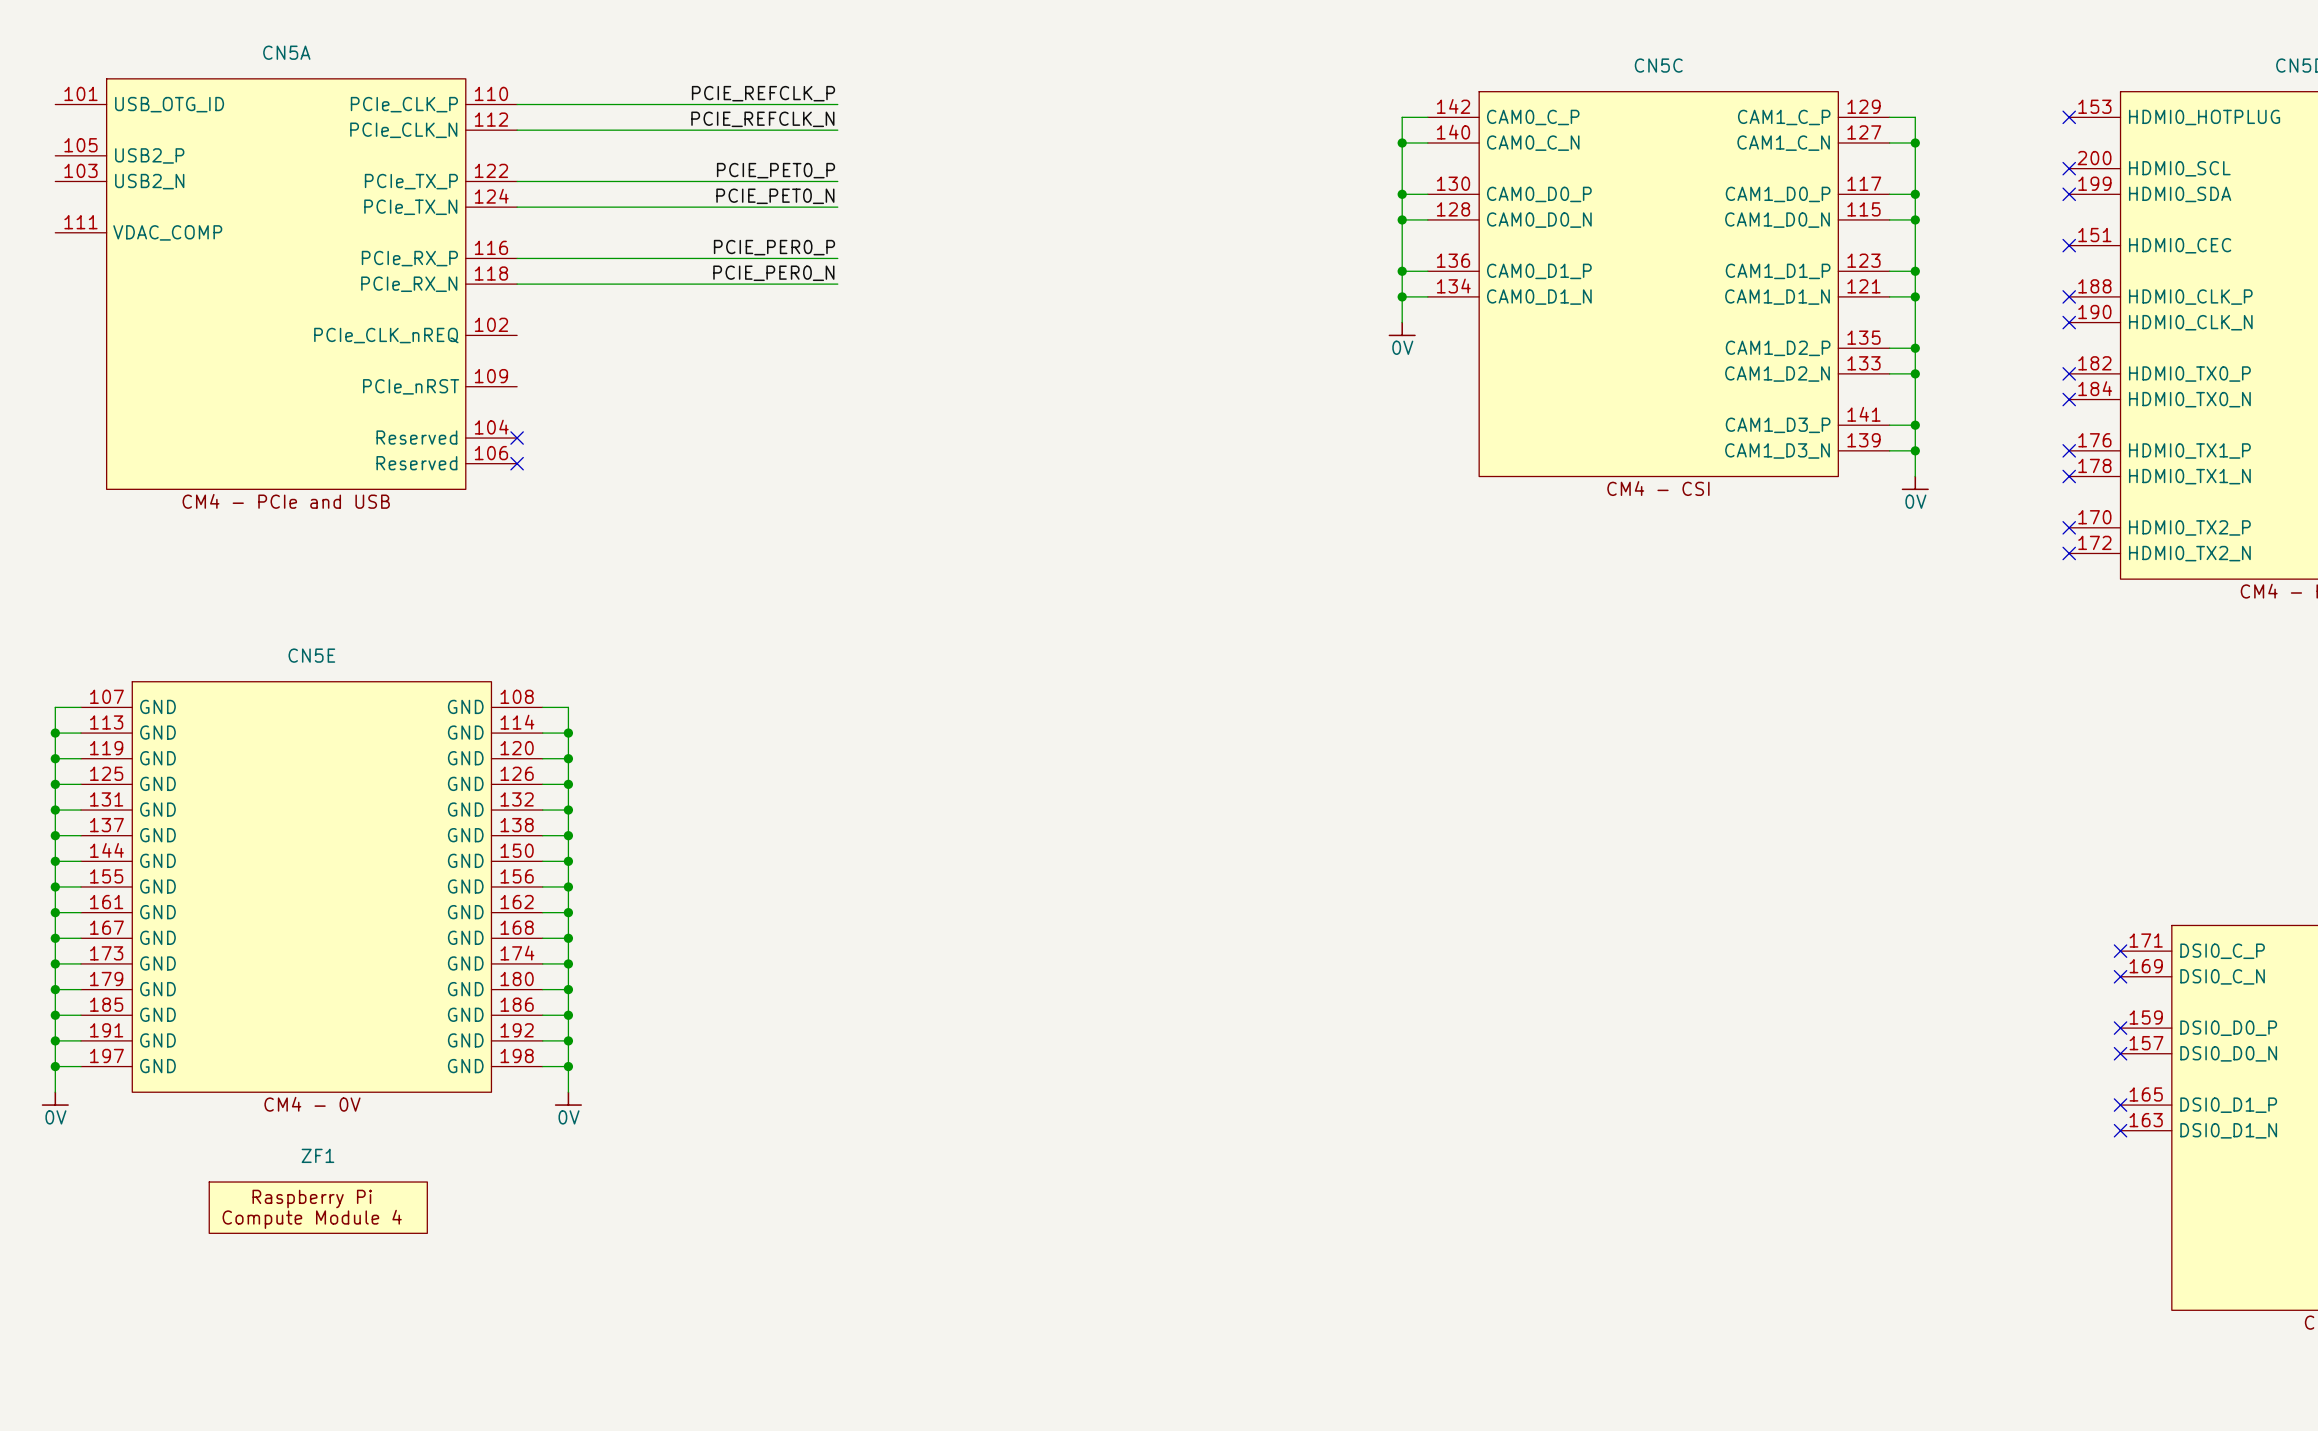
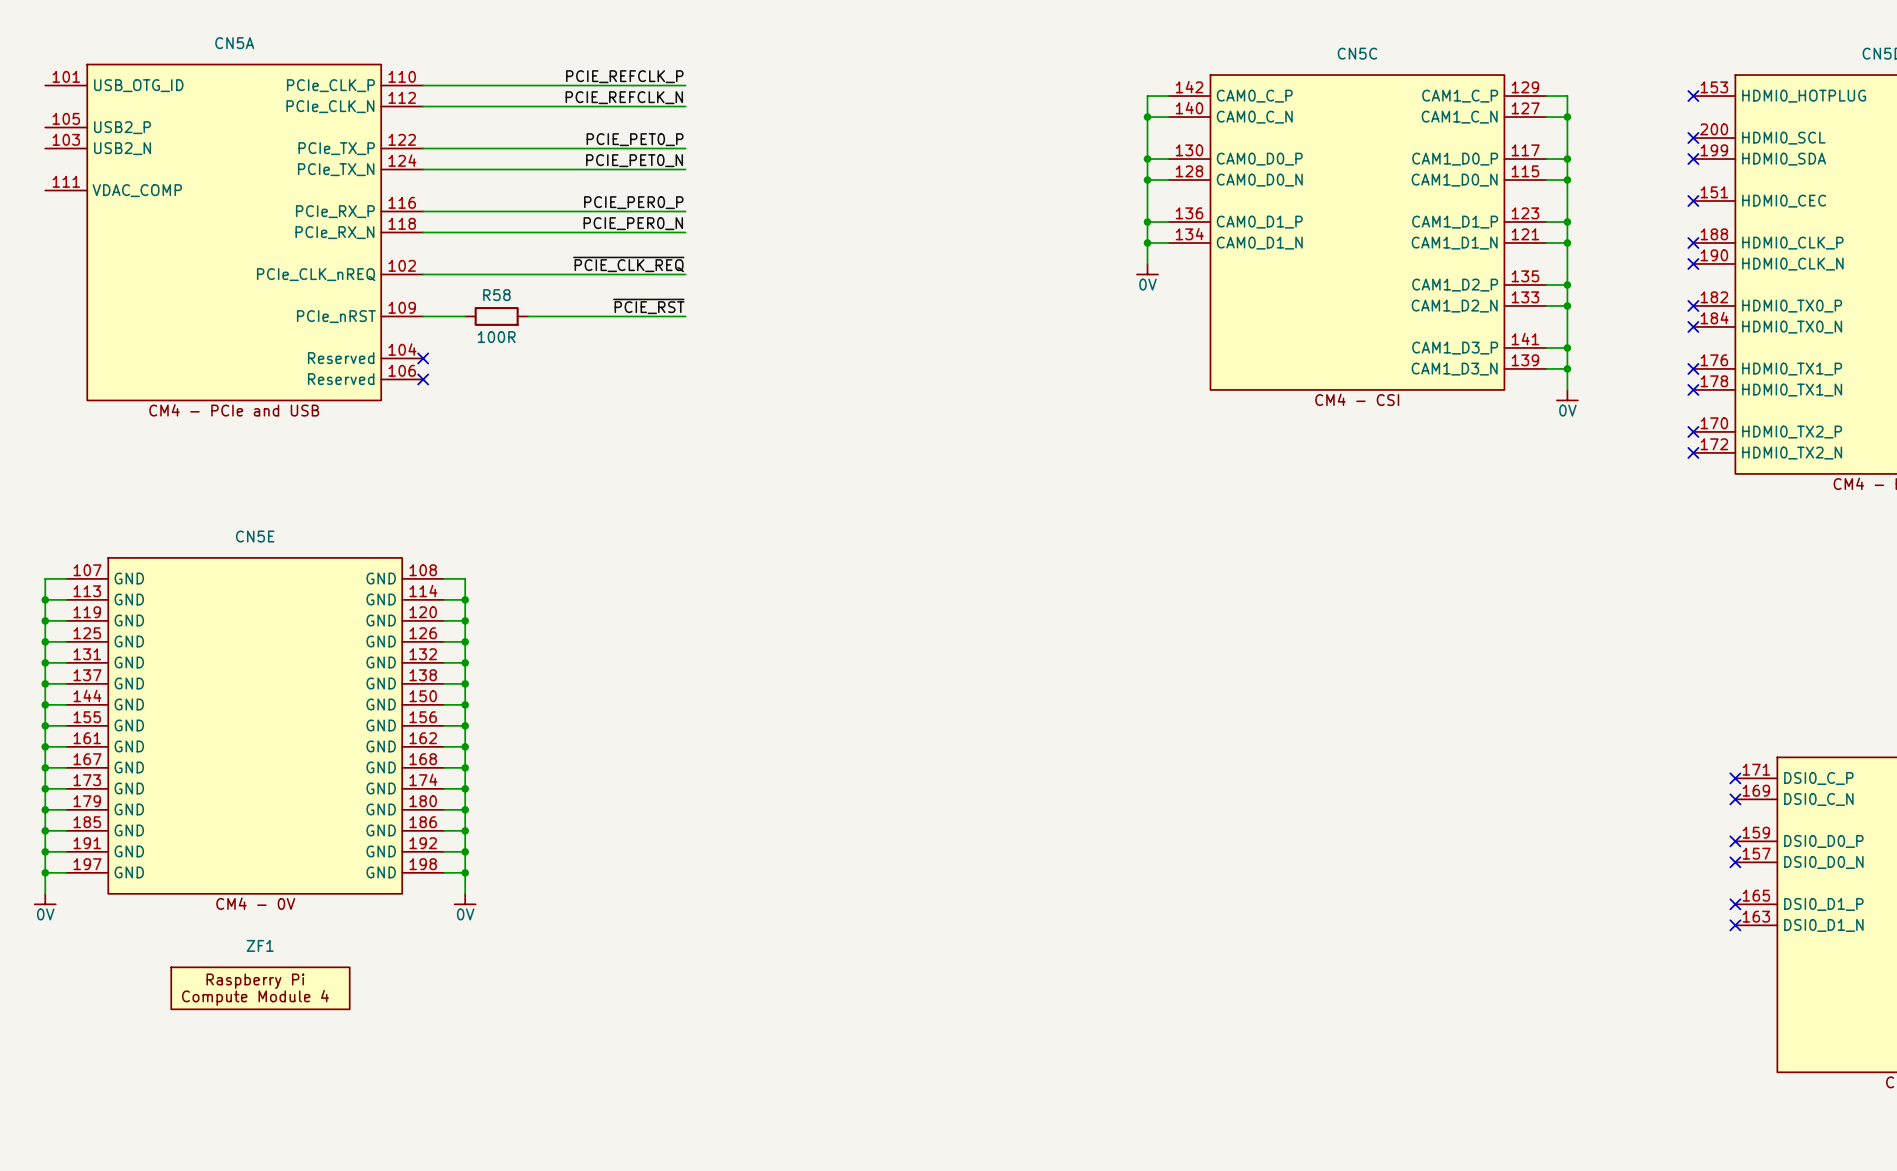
label: none -> ~{PCIE_CLK_REQ} (628, 264)
wire: none -> (423, 274) (685, 274)
label: none -> ~{PCIE_RST} (648, 306)
wire: none -> (423, 316) (465, 316)
R58: none -> 100R (496, 316)
wire: none -> (528, 316) (685, 316)

